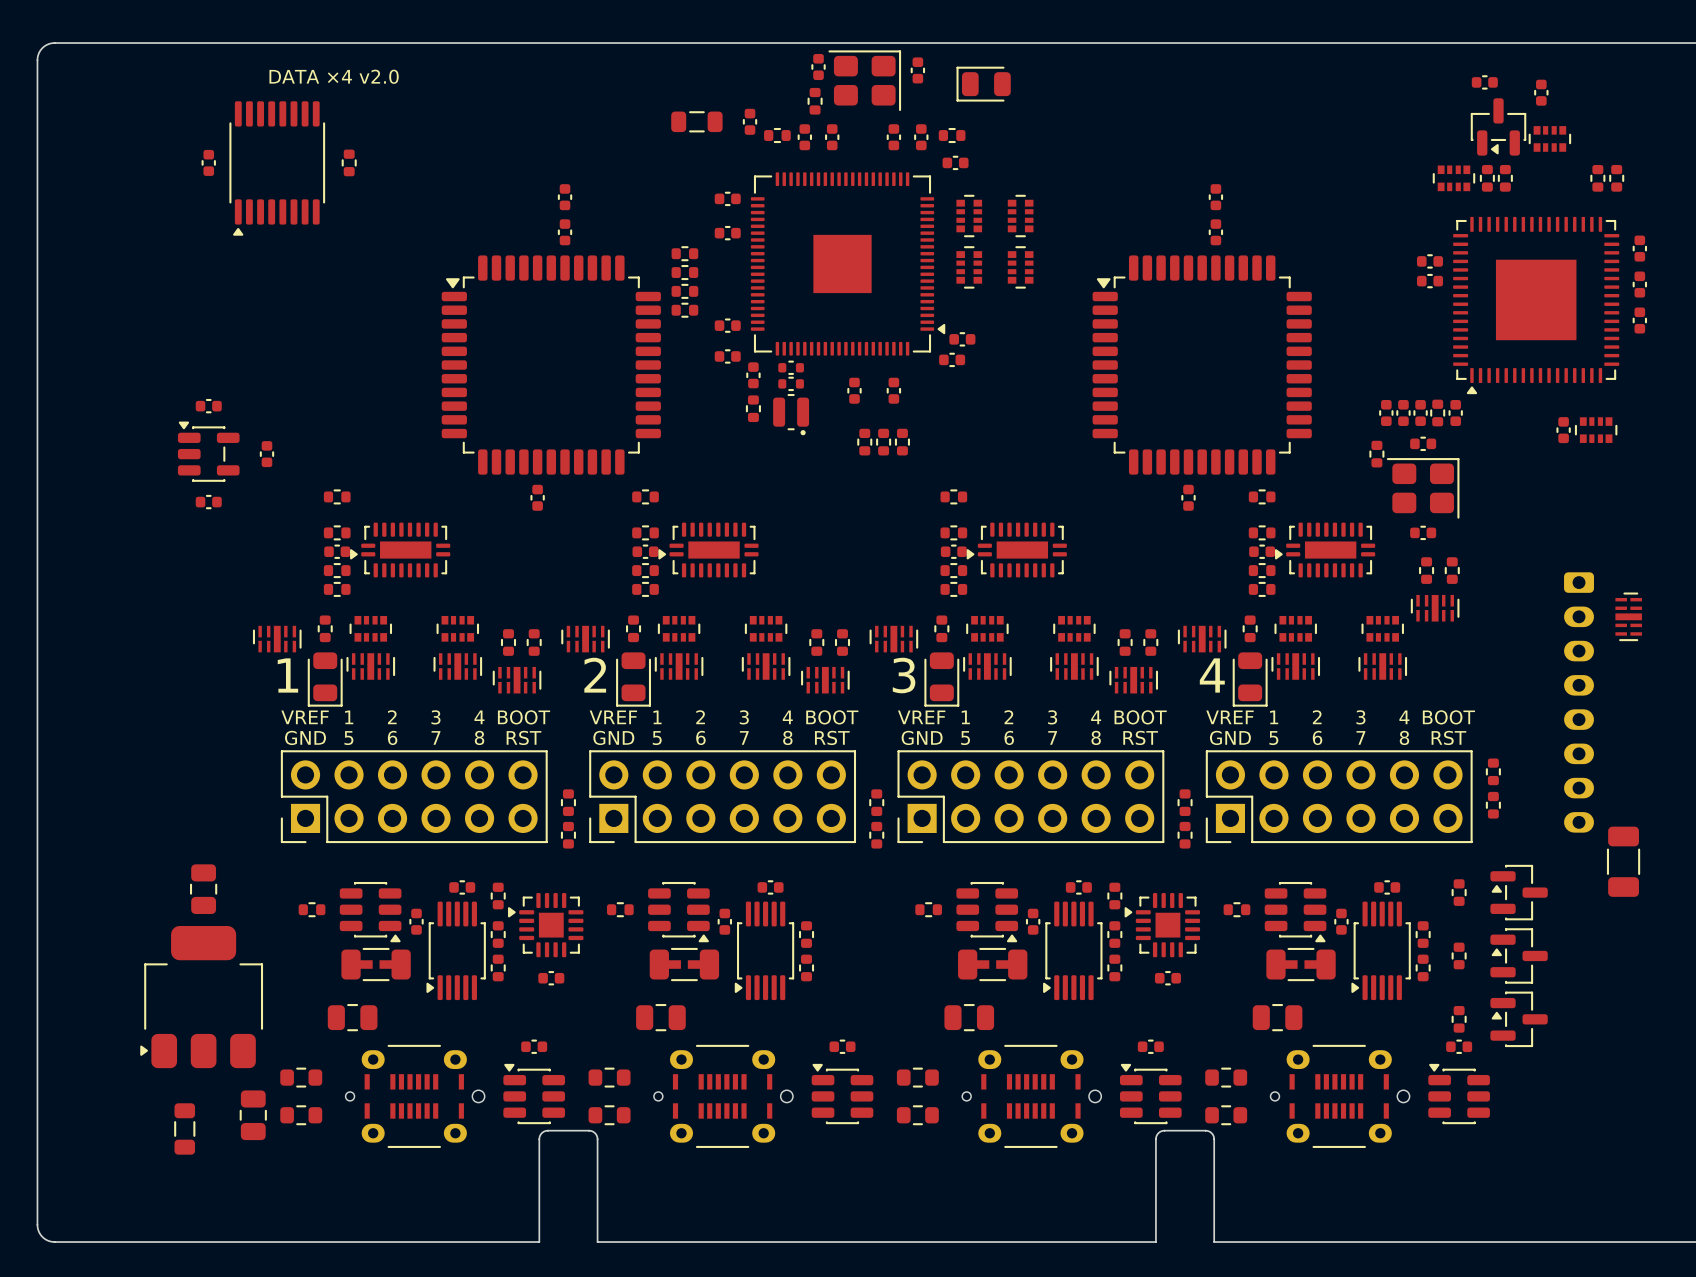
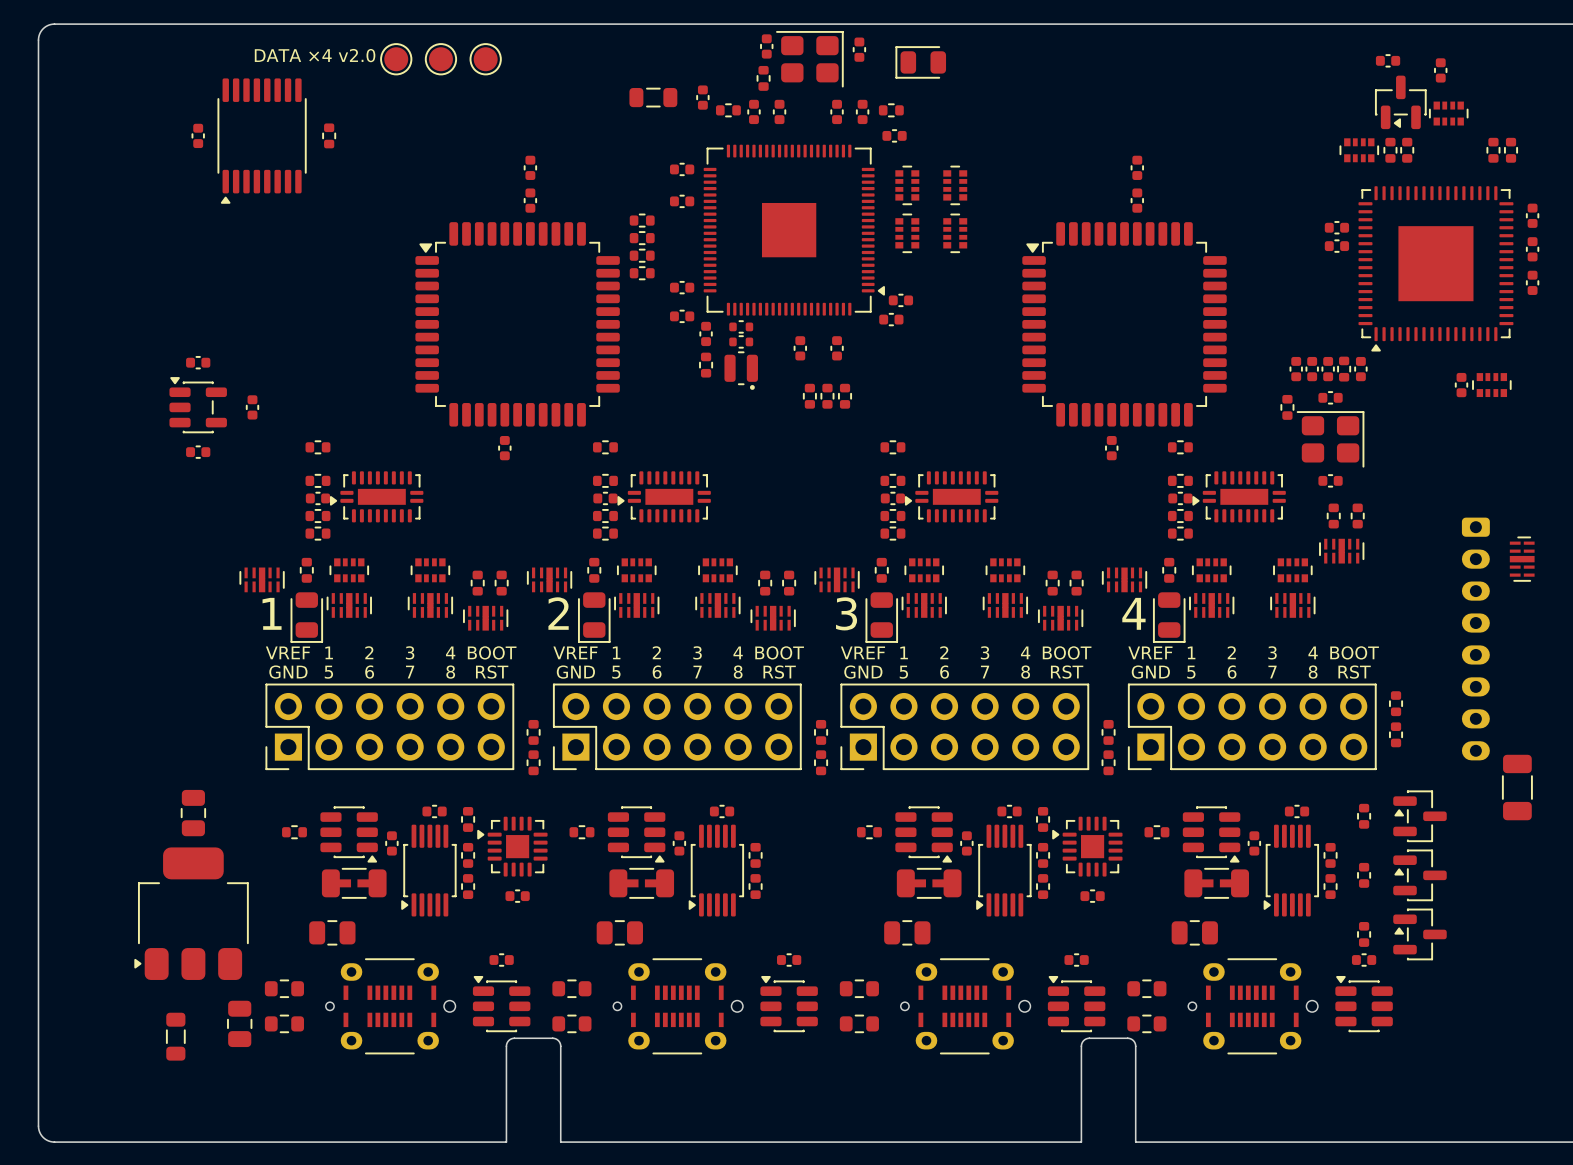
part: none -> (396, 59)
part: none -> (440, 59)
part: none -> (485, 59)

